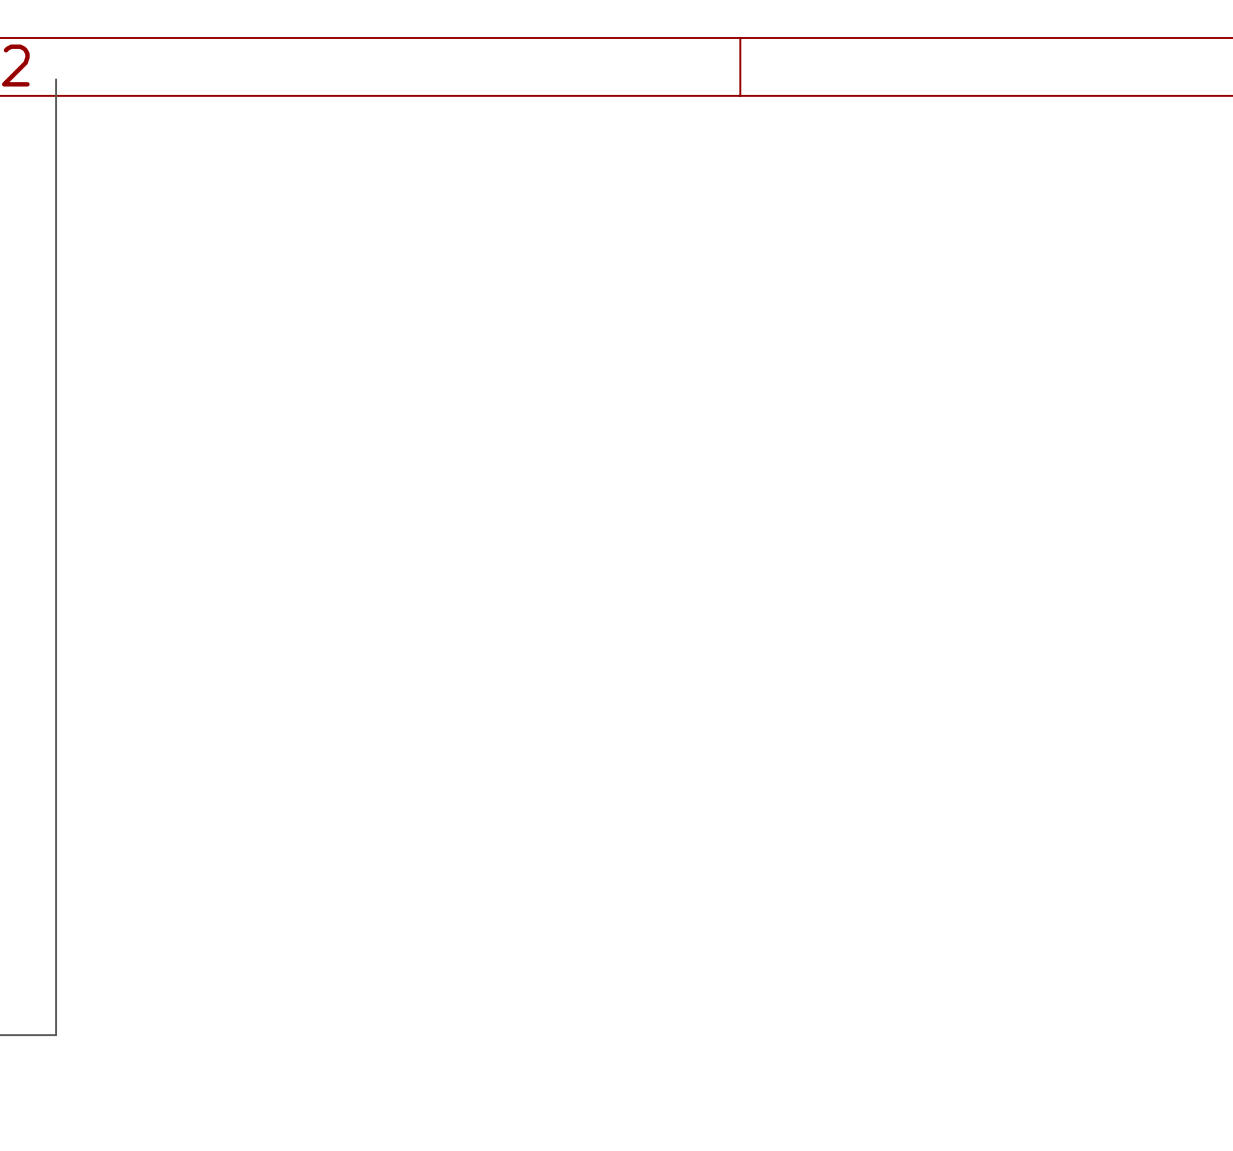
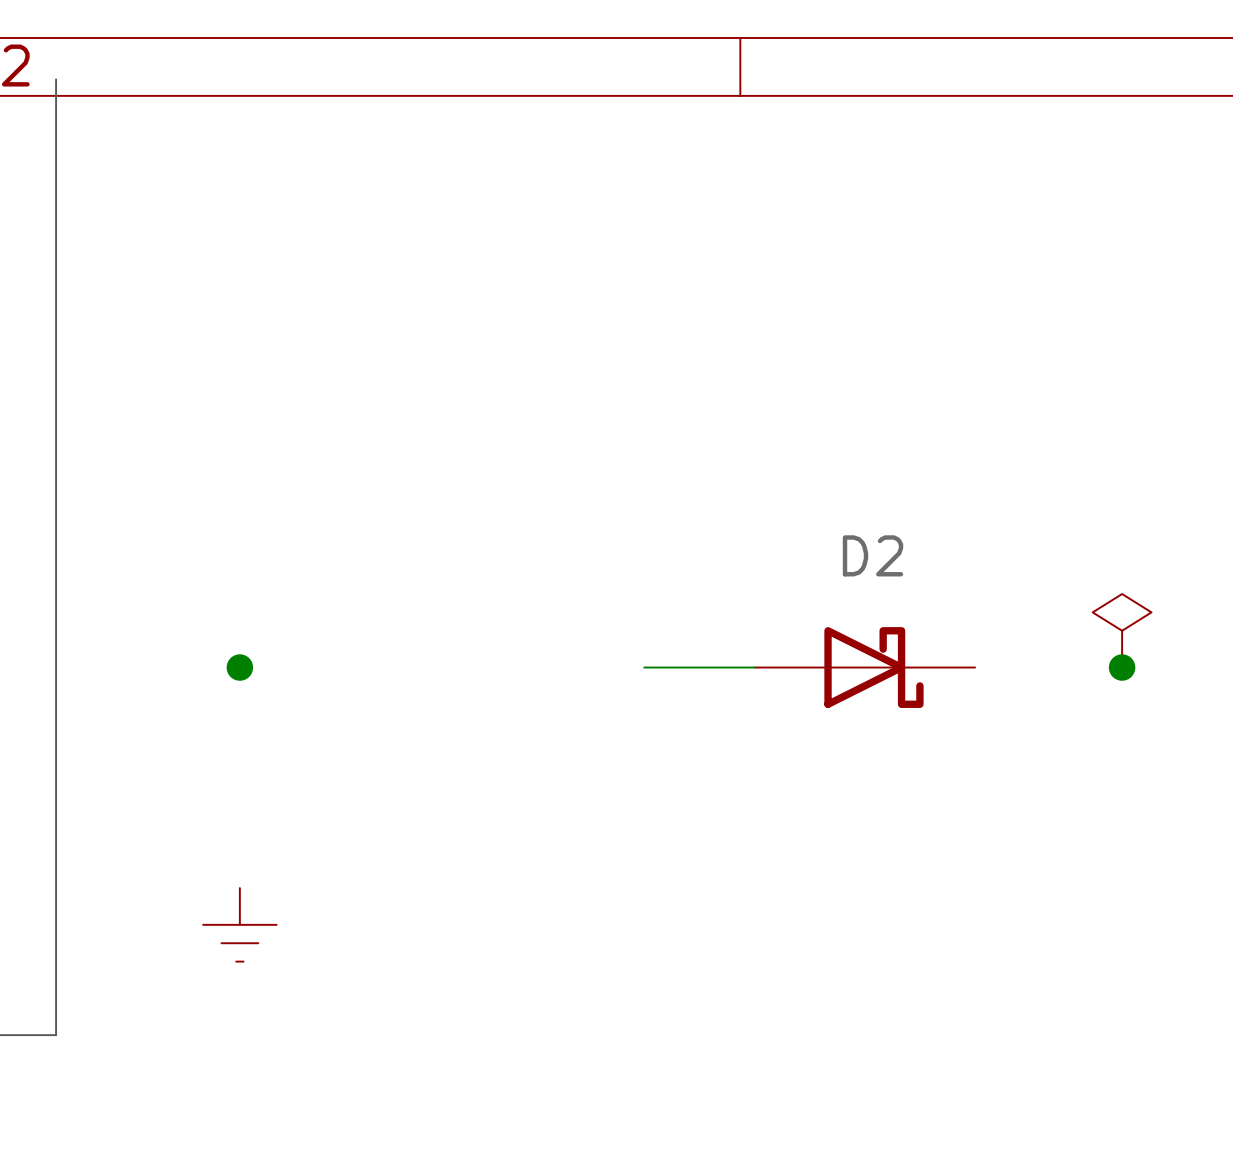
power symbol: none -> (1122, 630)
junction: none -> (239, 667)
wire: none -> (644, 667) (754, 667)
D2: none -> (864, 667)
junction: none -> (1122, 667)
power symbol: none -> (239, 924)

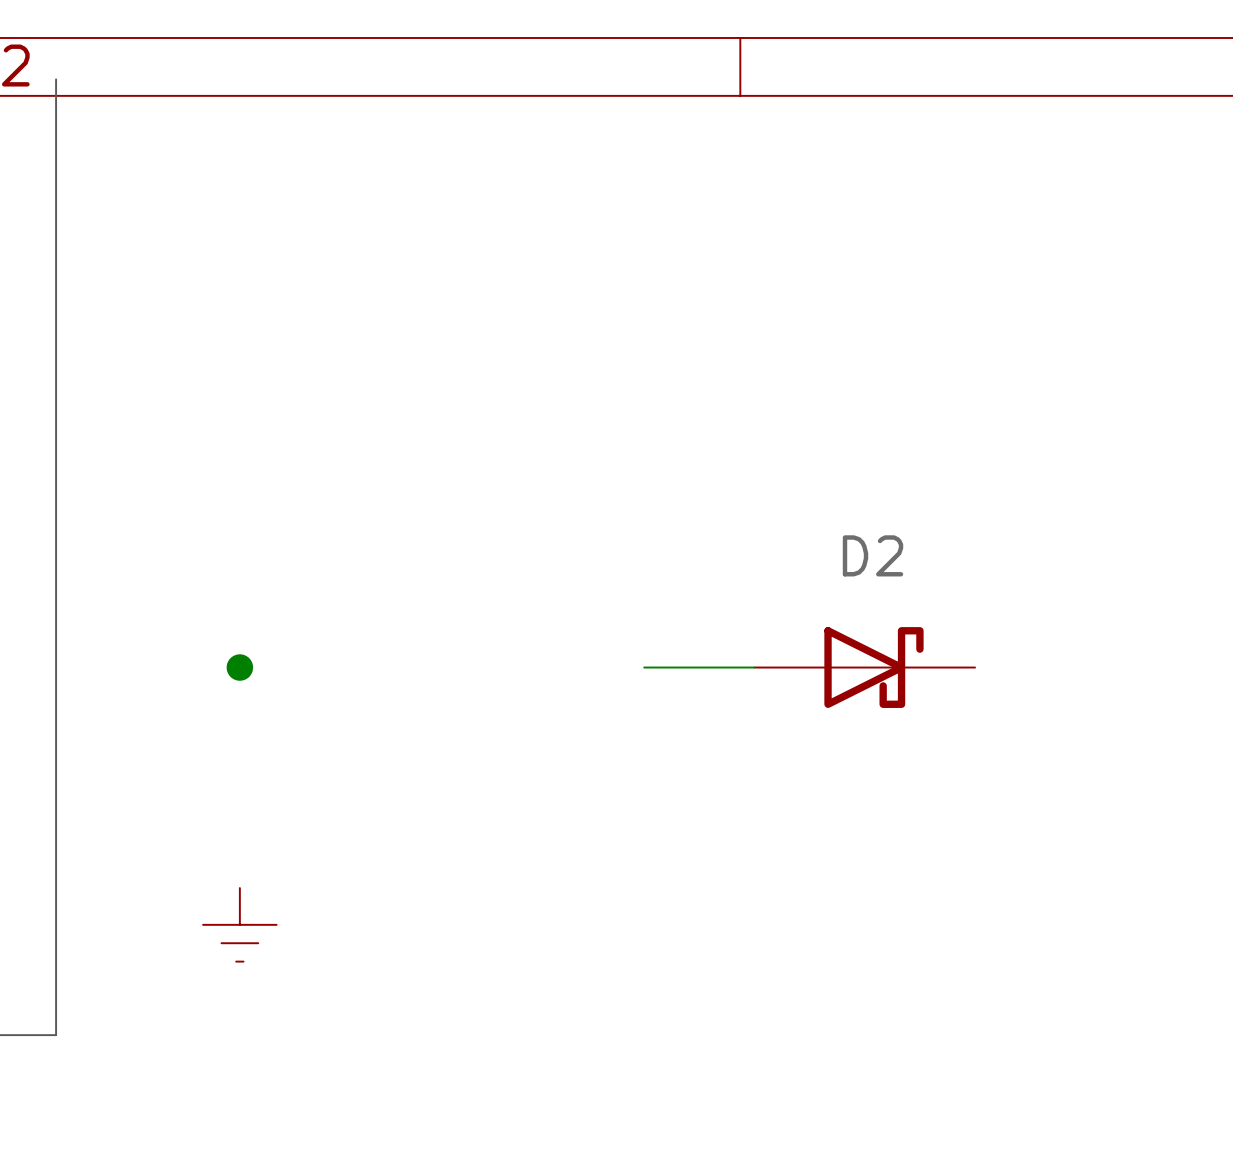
power symbol: (1122, 630) -> none
D2 flip: as is (873, 667) -> up-down (873, 667)
junction: (1122, 667) -> none

